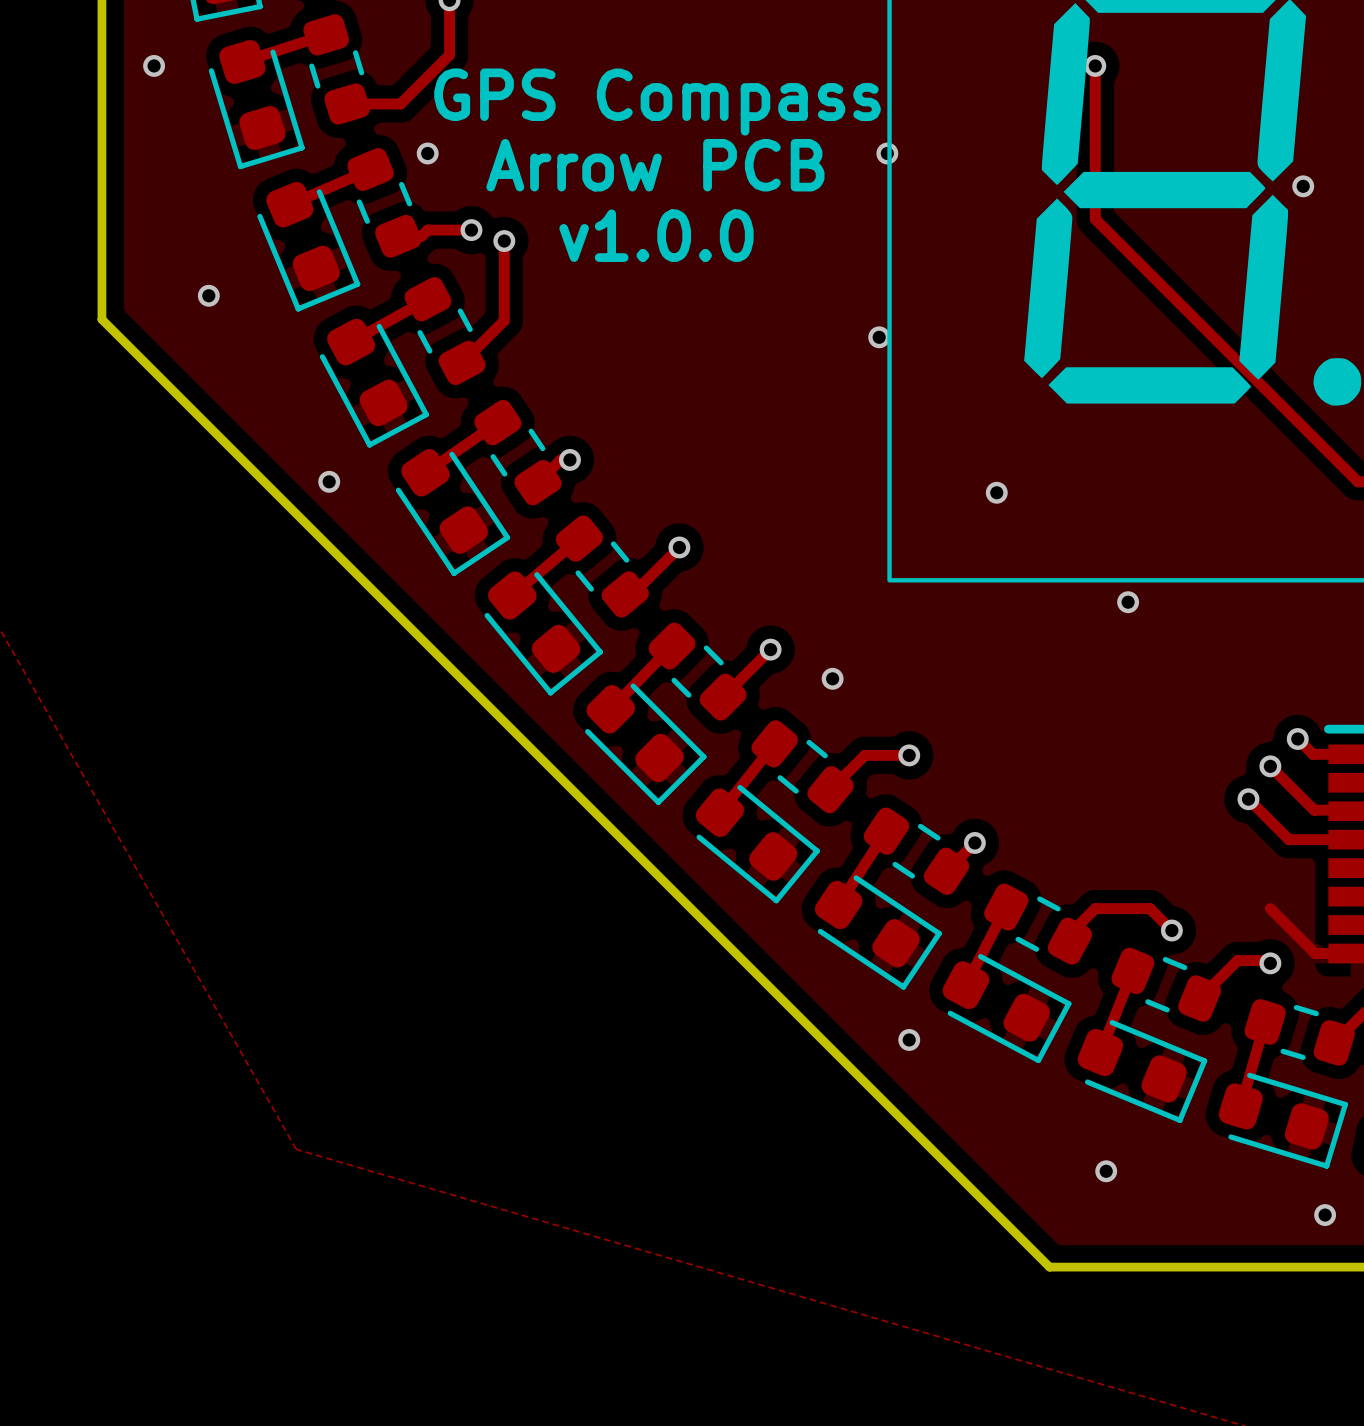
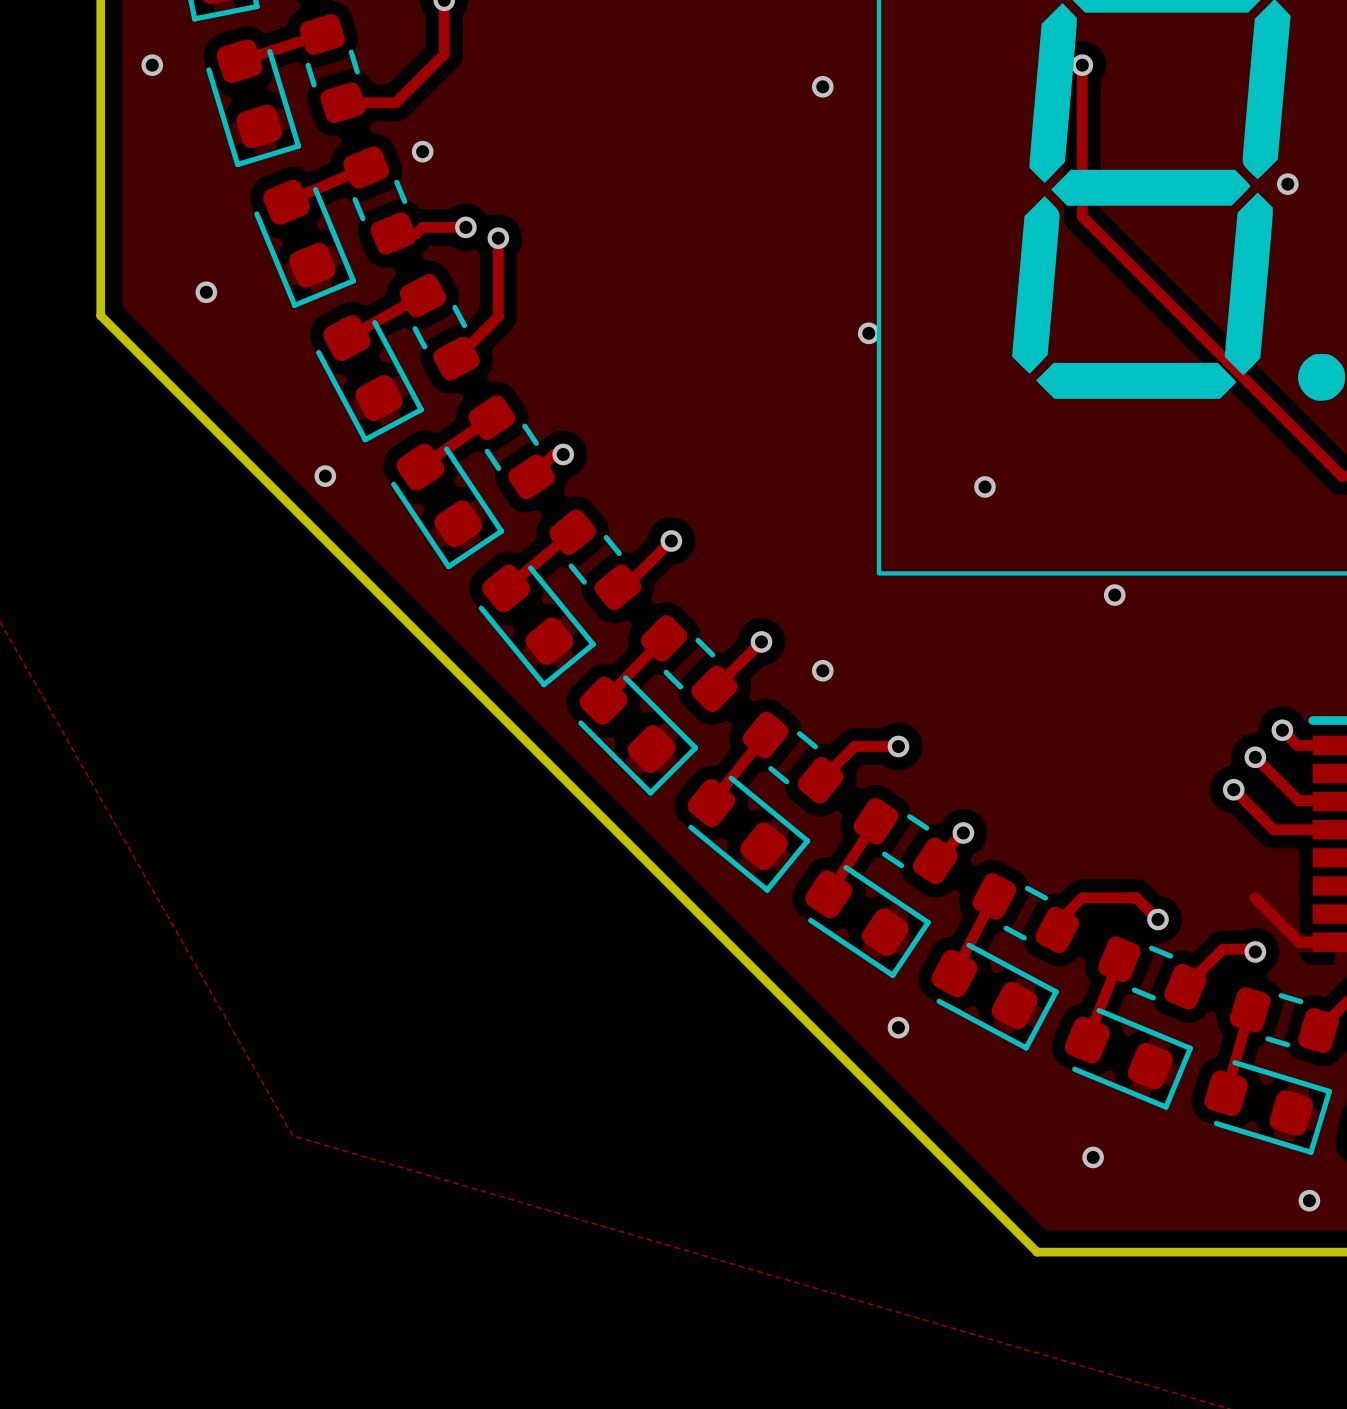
text: GPS Compass (657, 102) -> none
via position: (887, 153) -> (822, 86)
text: Arrow PCB (655, 165) -> none
text: v1.0.0 (656, 235) -> none

